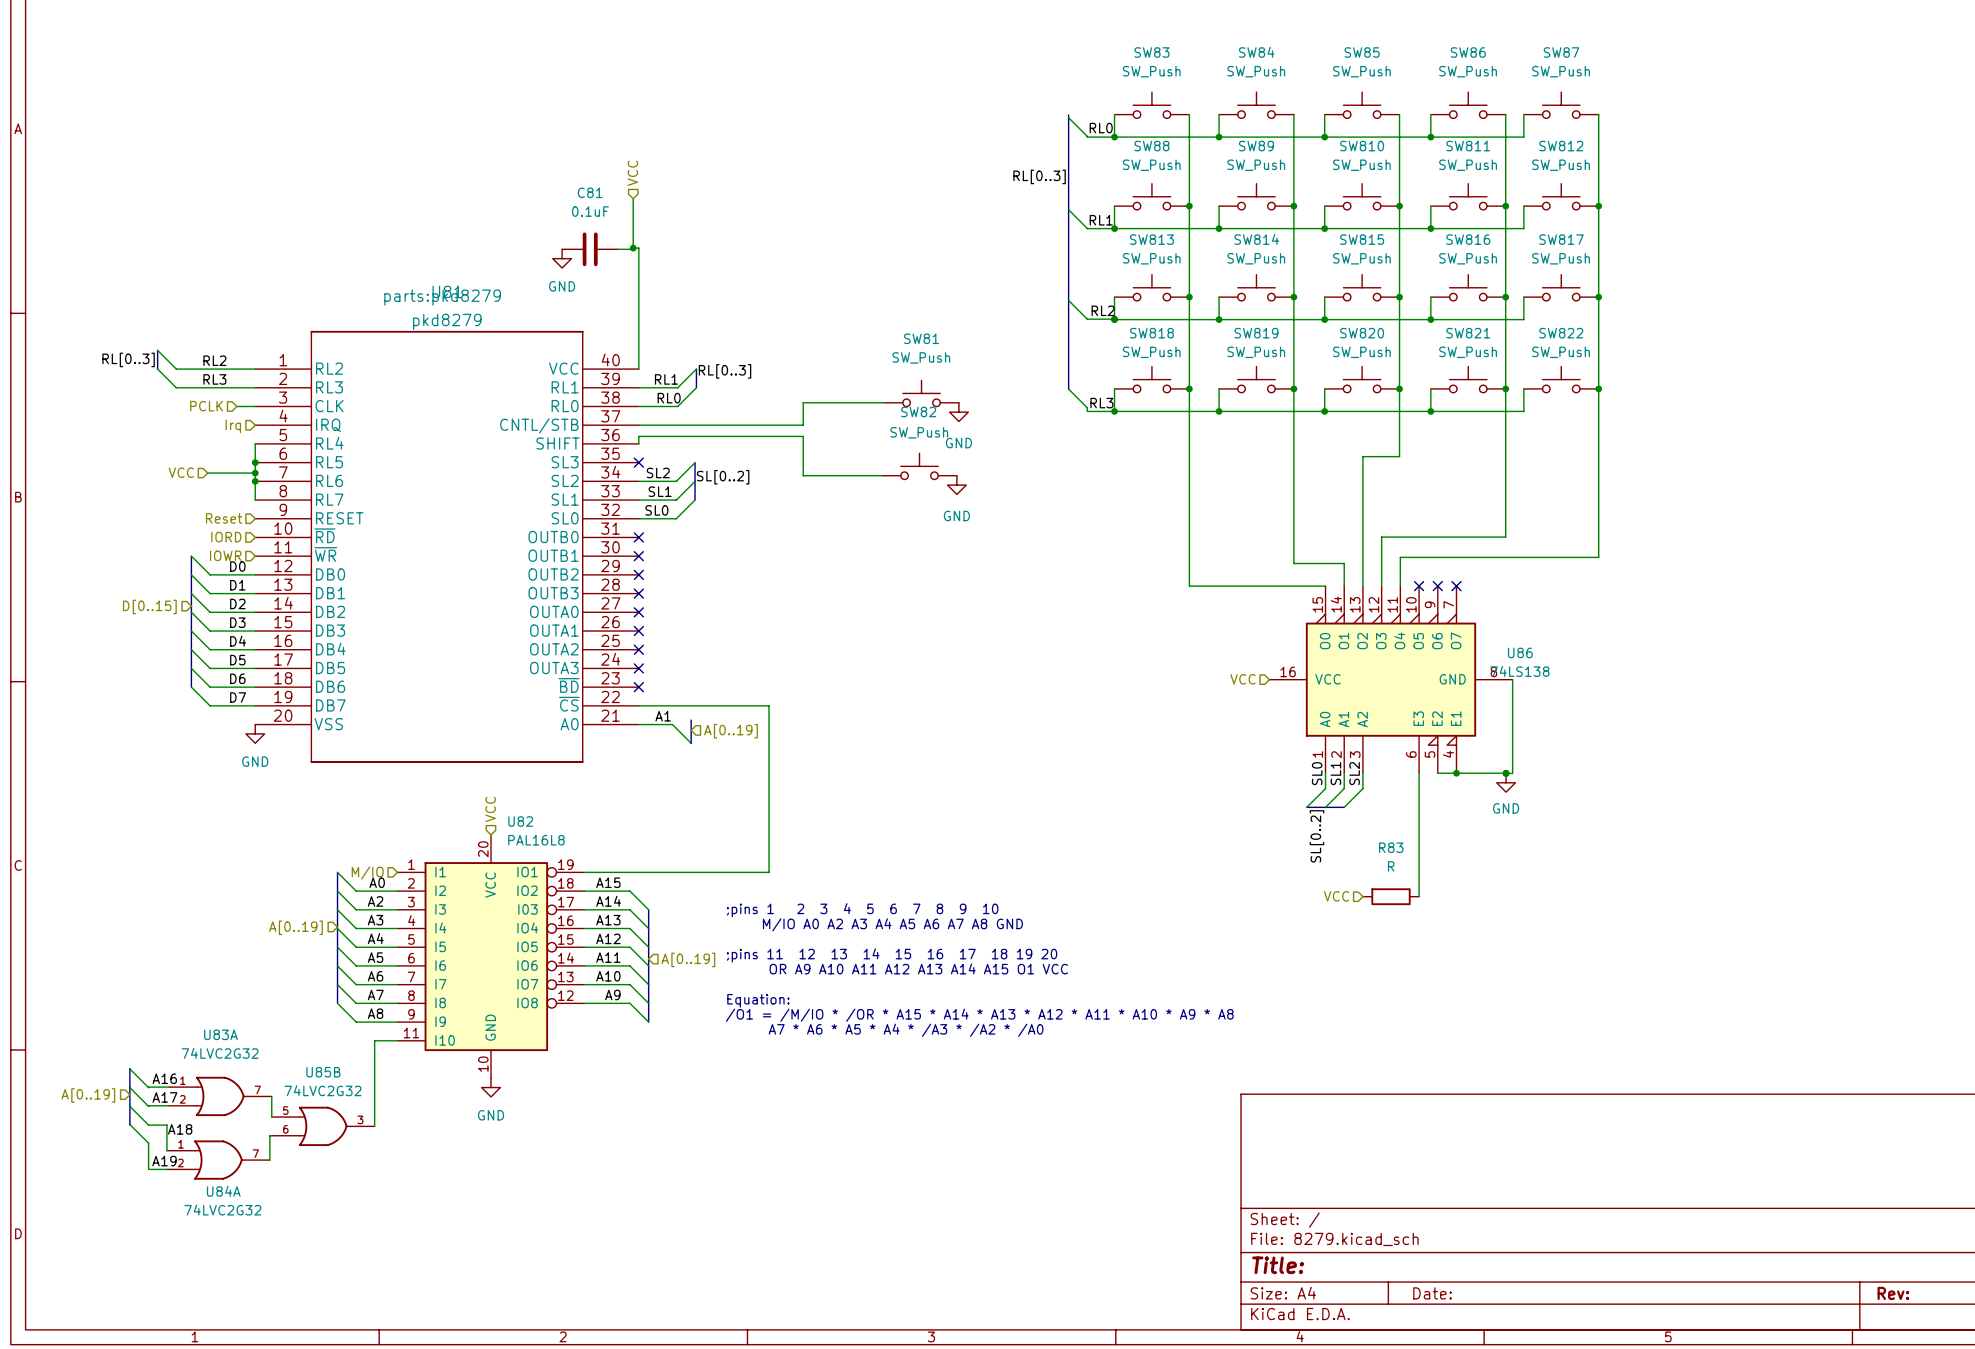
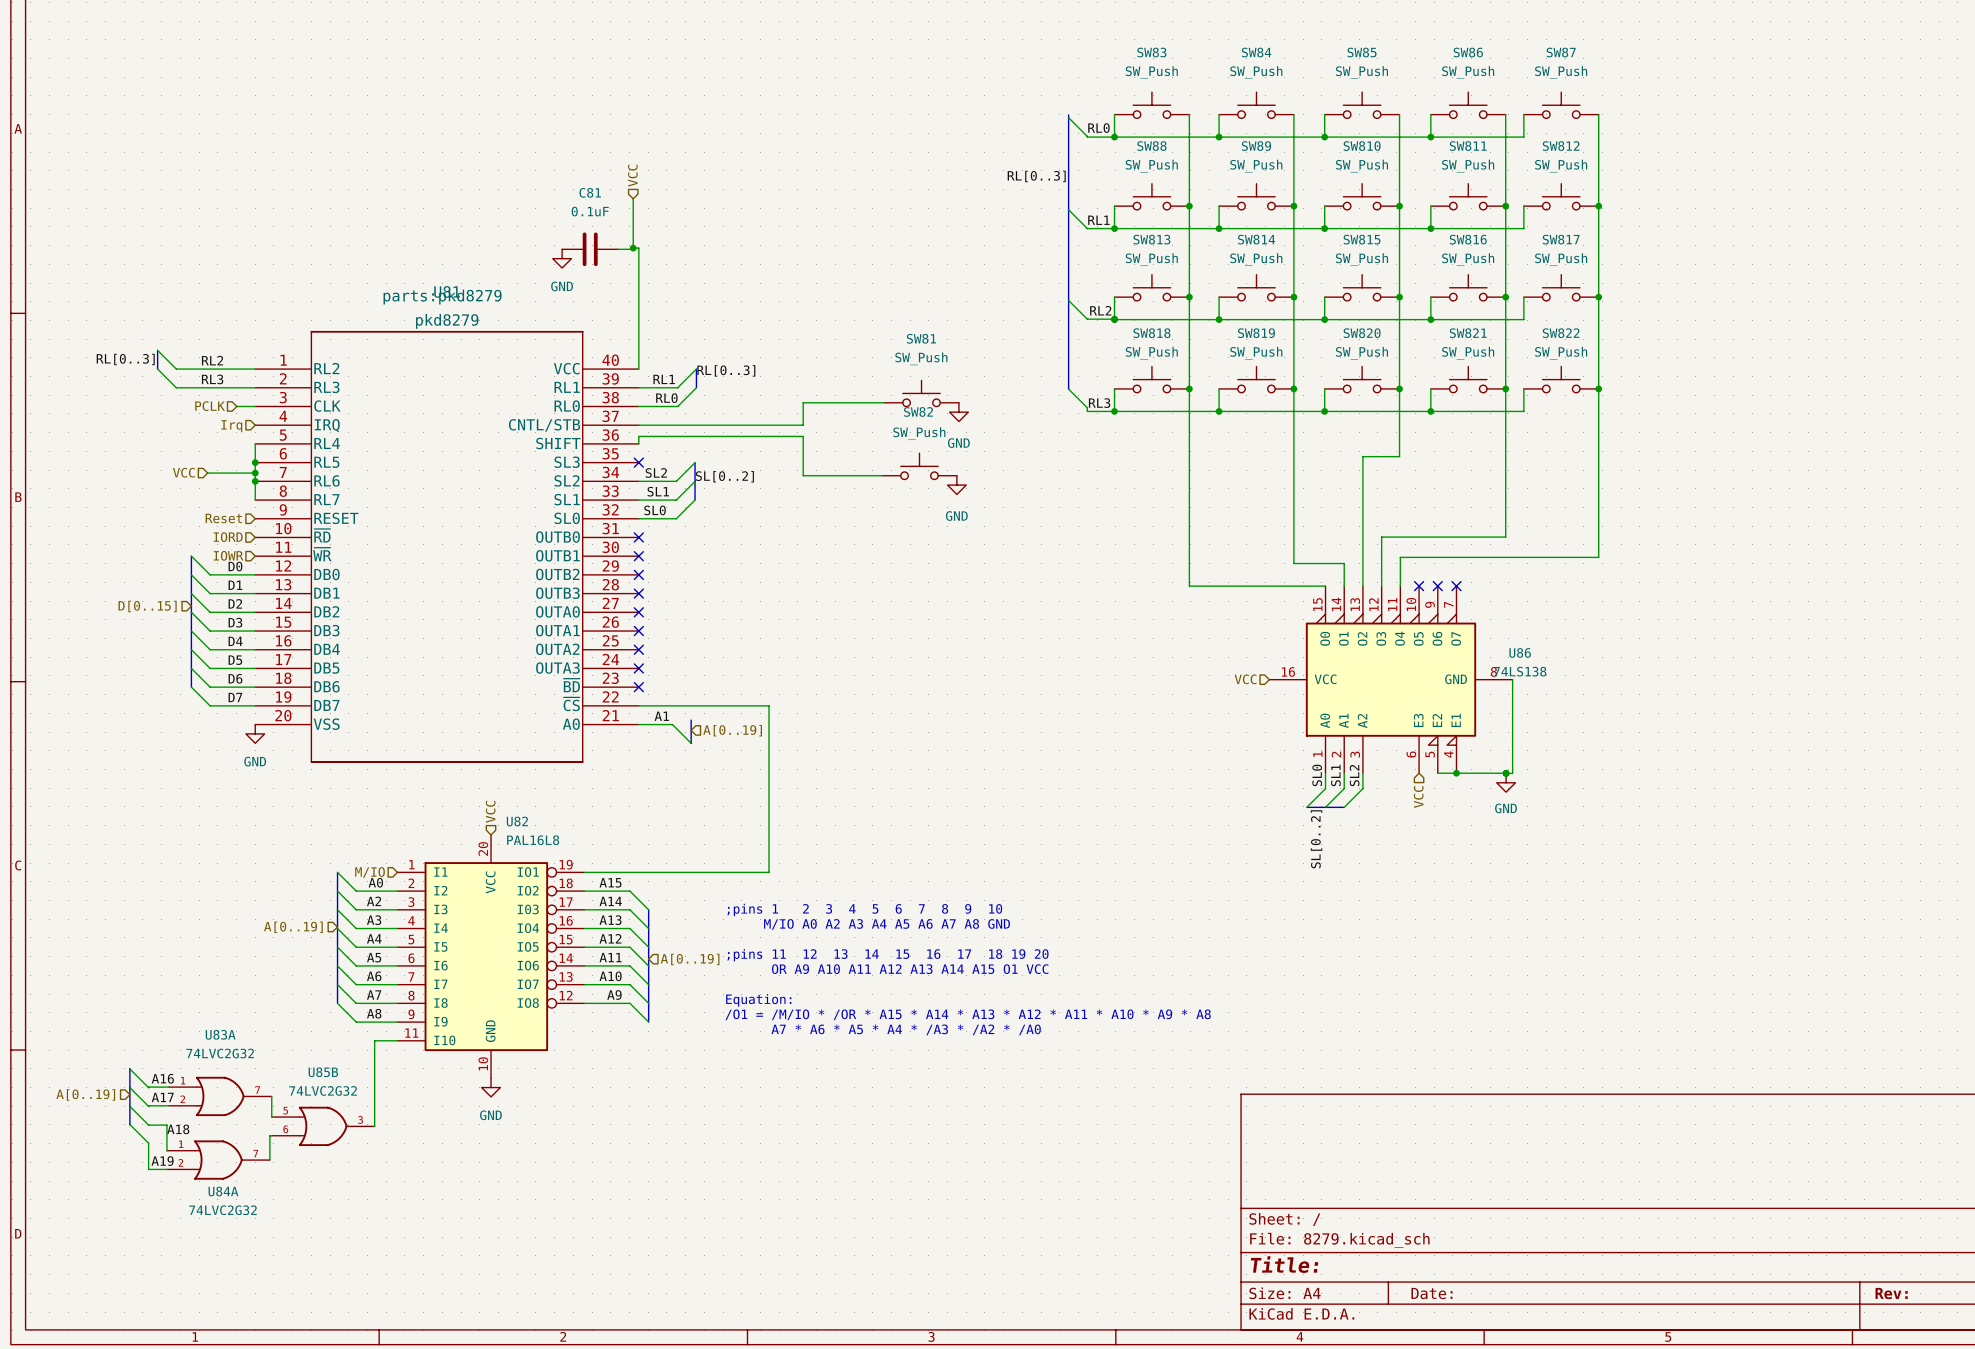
wire: (1419, 773) (1419, 896) -> none
hierarchical label rotation: 0° (1336, 896) -> 90° counterclockwise (1418, 797)
hierarchical label position: VCC (1336, 896) -> VCC (1418, 797)
R83: R (1391, 896) -> none

